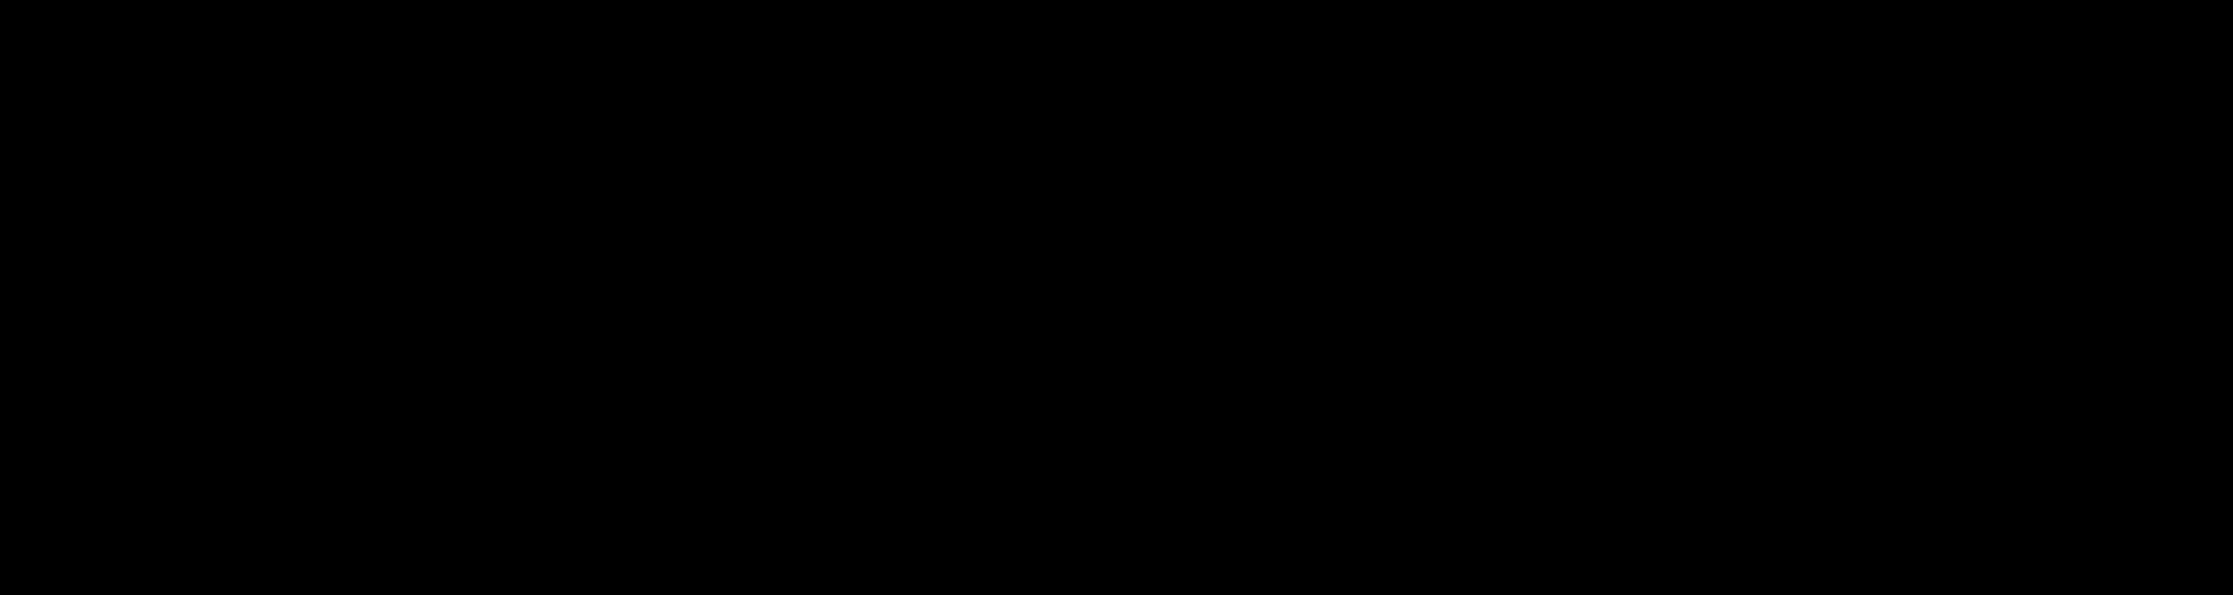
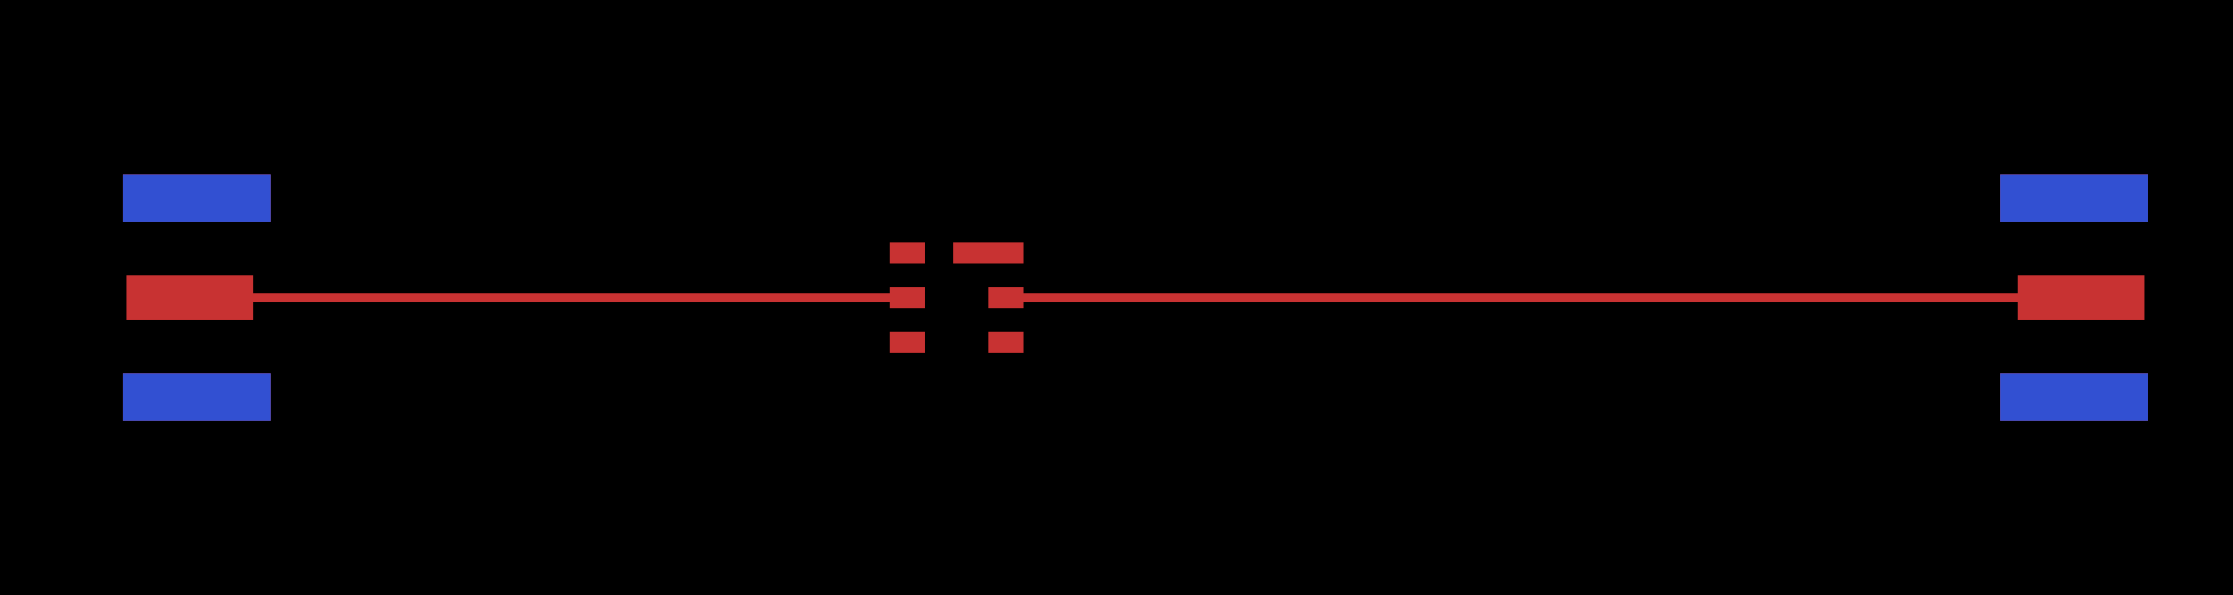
part: none -> (196, 297)
top track: none -> (907, 297) (189, 297)
part: none -> (956, 297)
part: none -> (2074, 297)
top track: none -> (2081, 297) (1005, 297)

